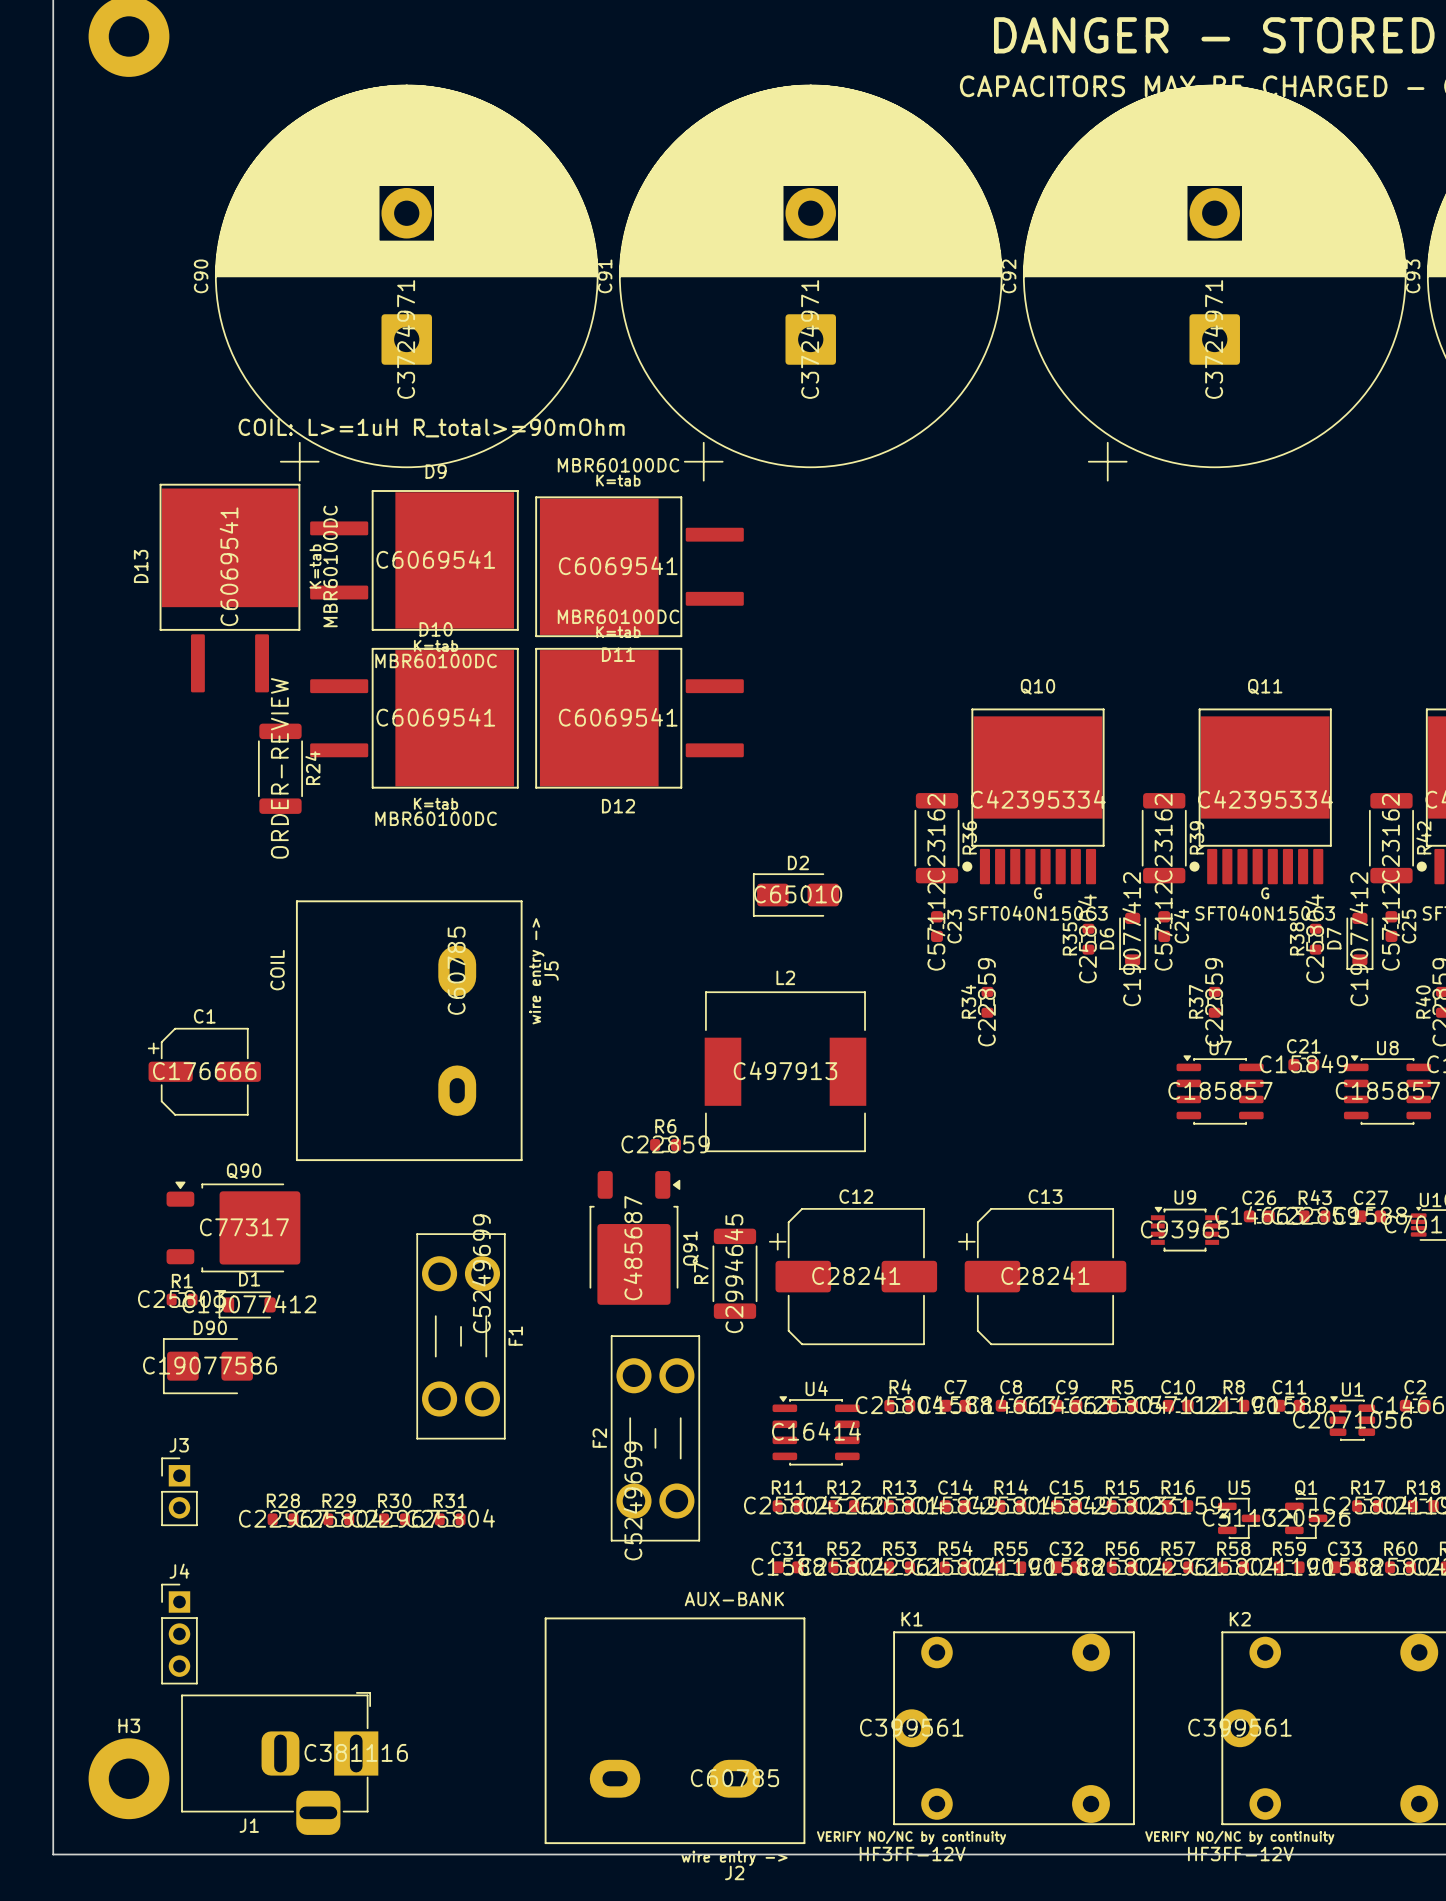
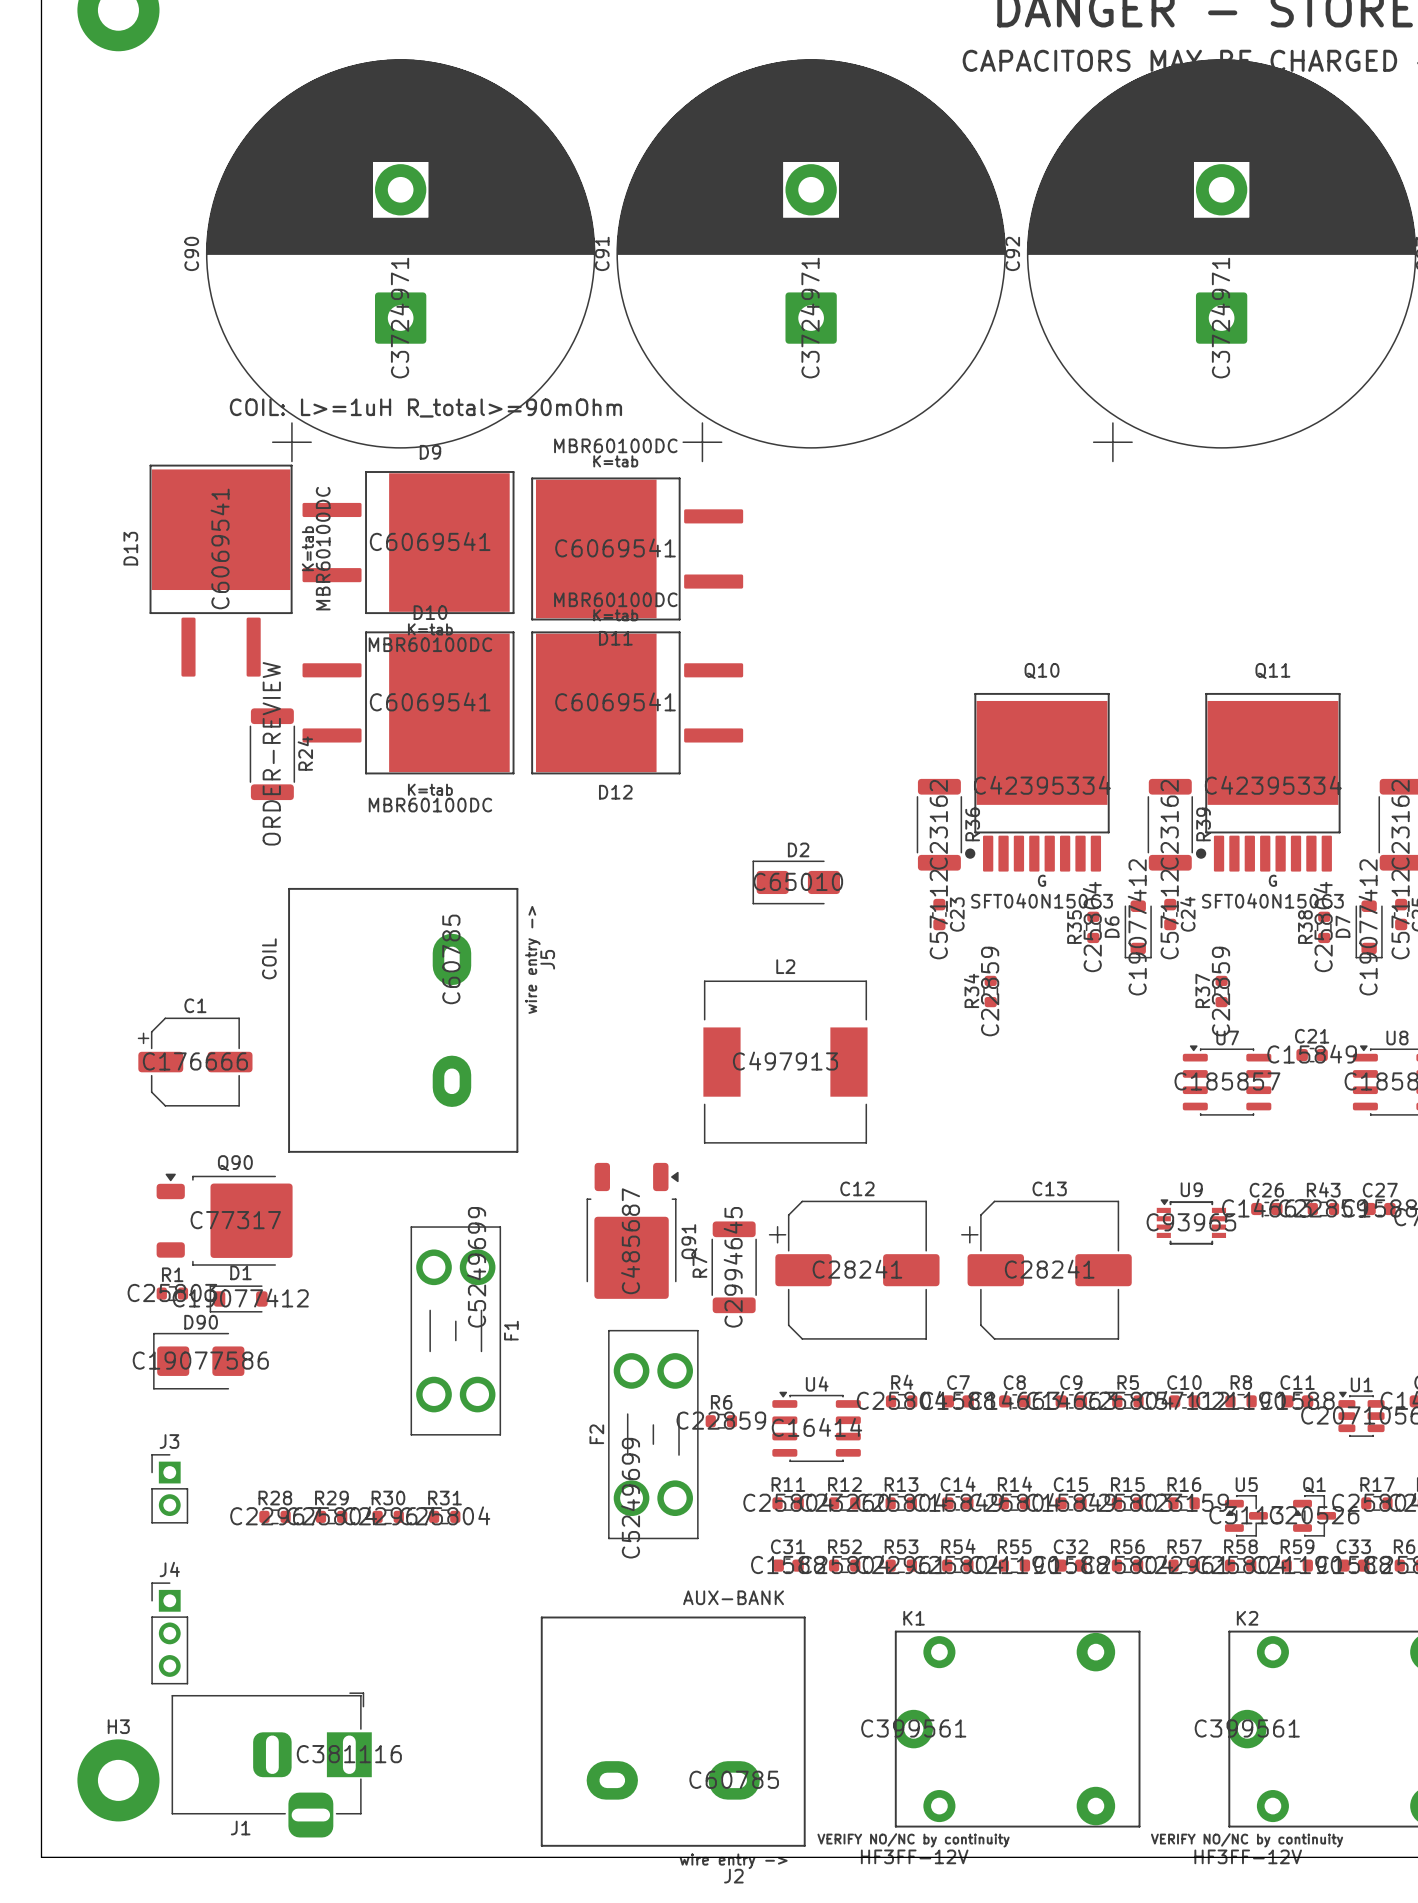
R6 position: (665, 1144) -> (721, 1421)

